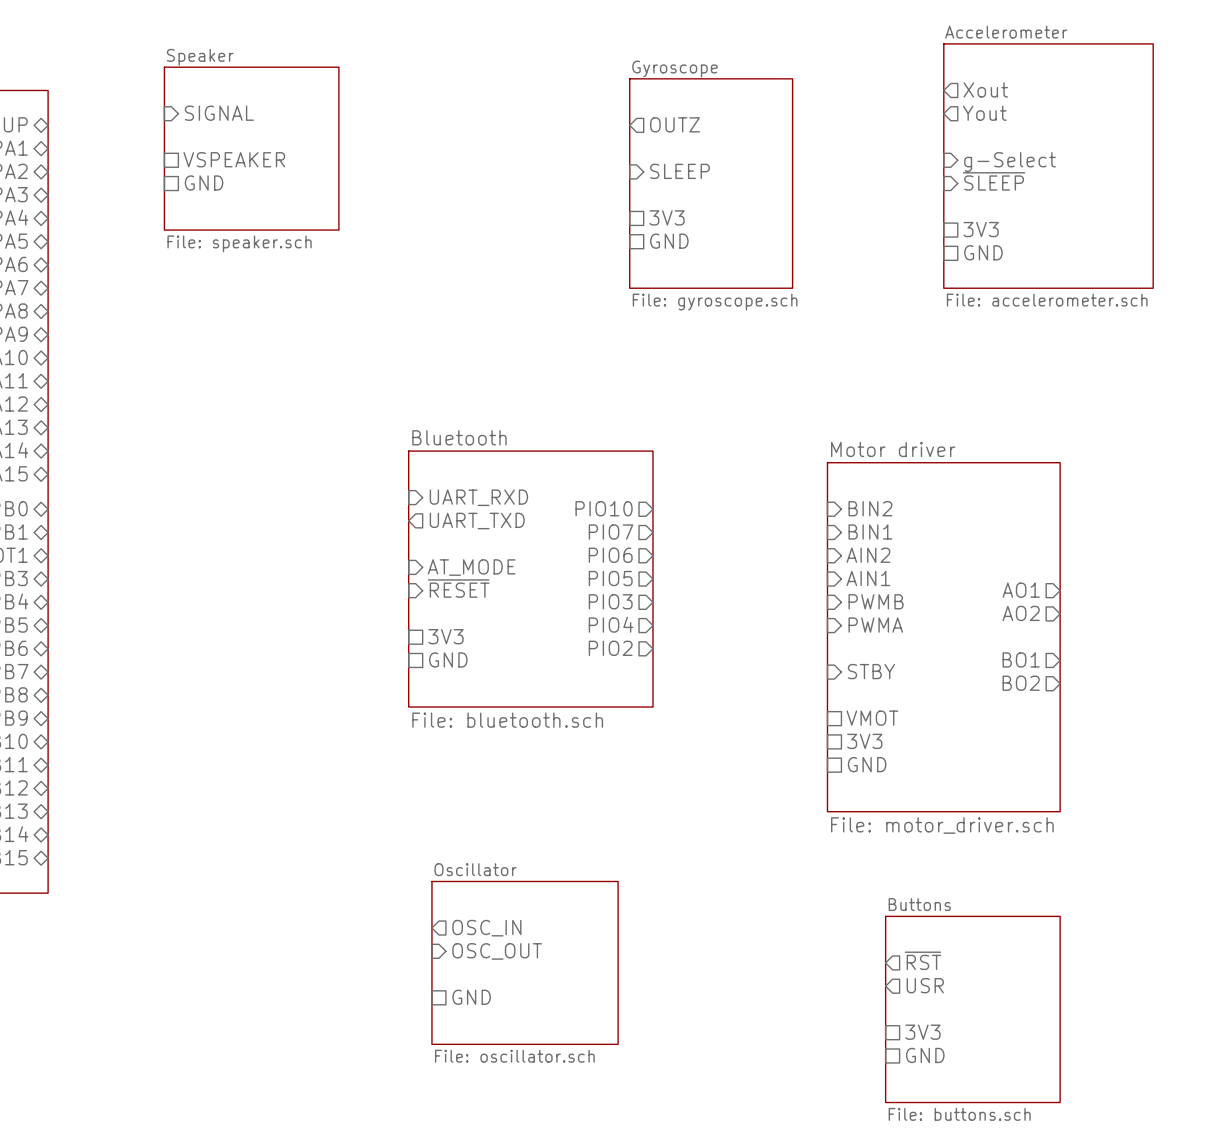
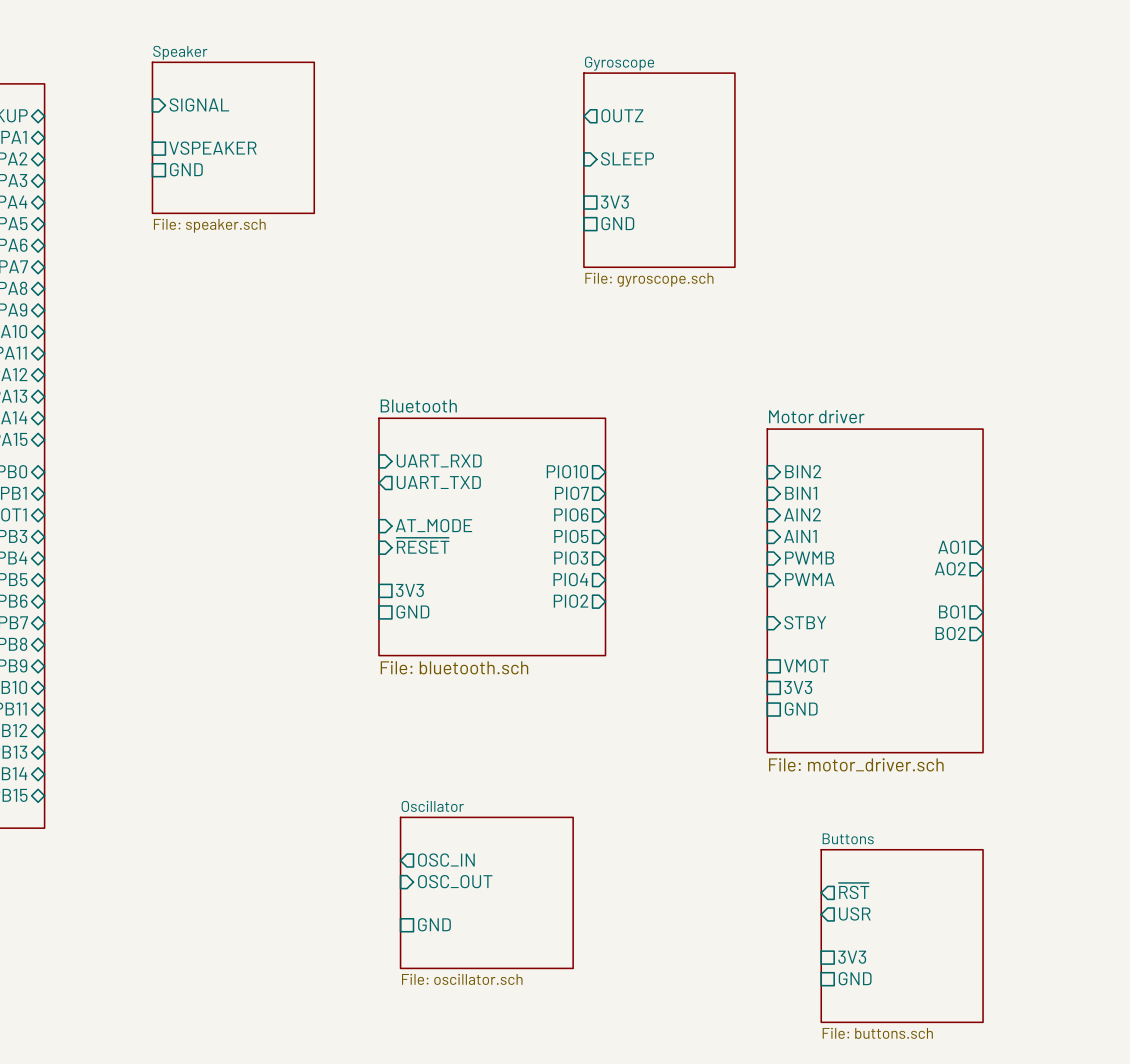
sheet pin: Xout (985, 89) -> none
sheet pin: Yout (984, 113) -> none
sheet pin: g-Select (1010, 162) -> none
sheet Accelerometer: File: accelerometer.sch (1048, 166) -> none
sheet pin: ~{SLEEP} (994, 181) -> none
sheet pin: 3V3 (981, 229) -> none
sheet pin: GND (983, 252) -> none

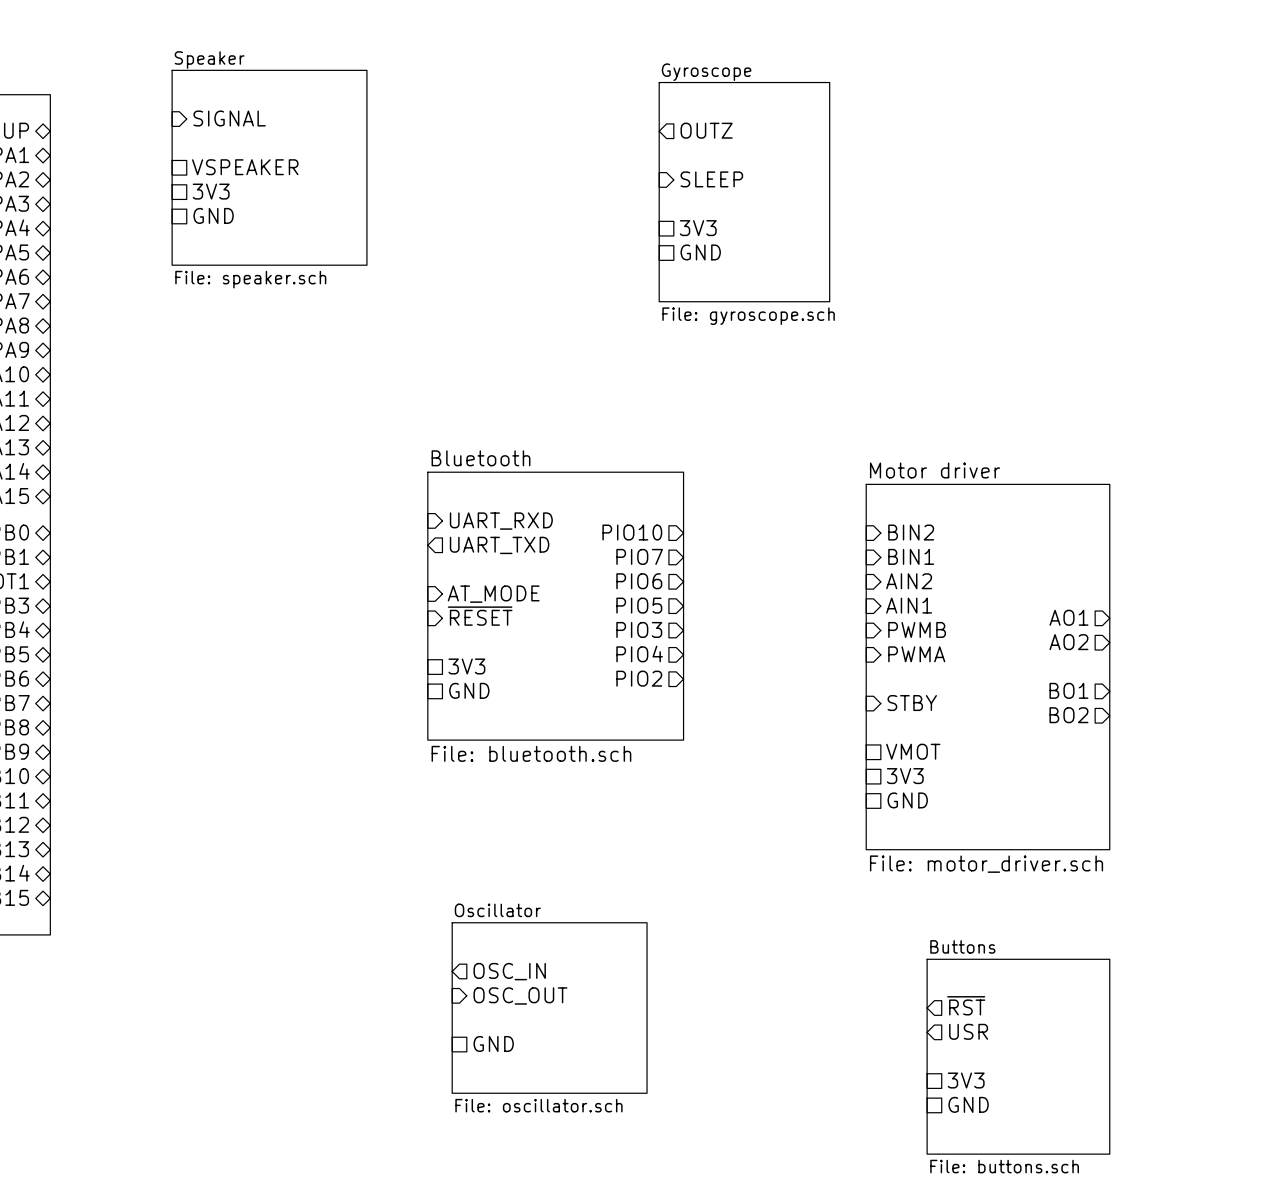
sheet Speaker: File: speaker.sch (233, 137) -> none
sheet Speaker: none -> File: speaker.sch (269, 167)
sheet pin: GND (186, 169) -> 3V3 (211, 191)
sheet pin: none -> GND (213, 215)

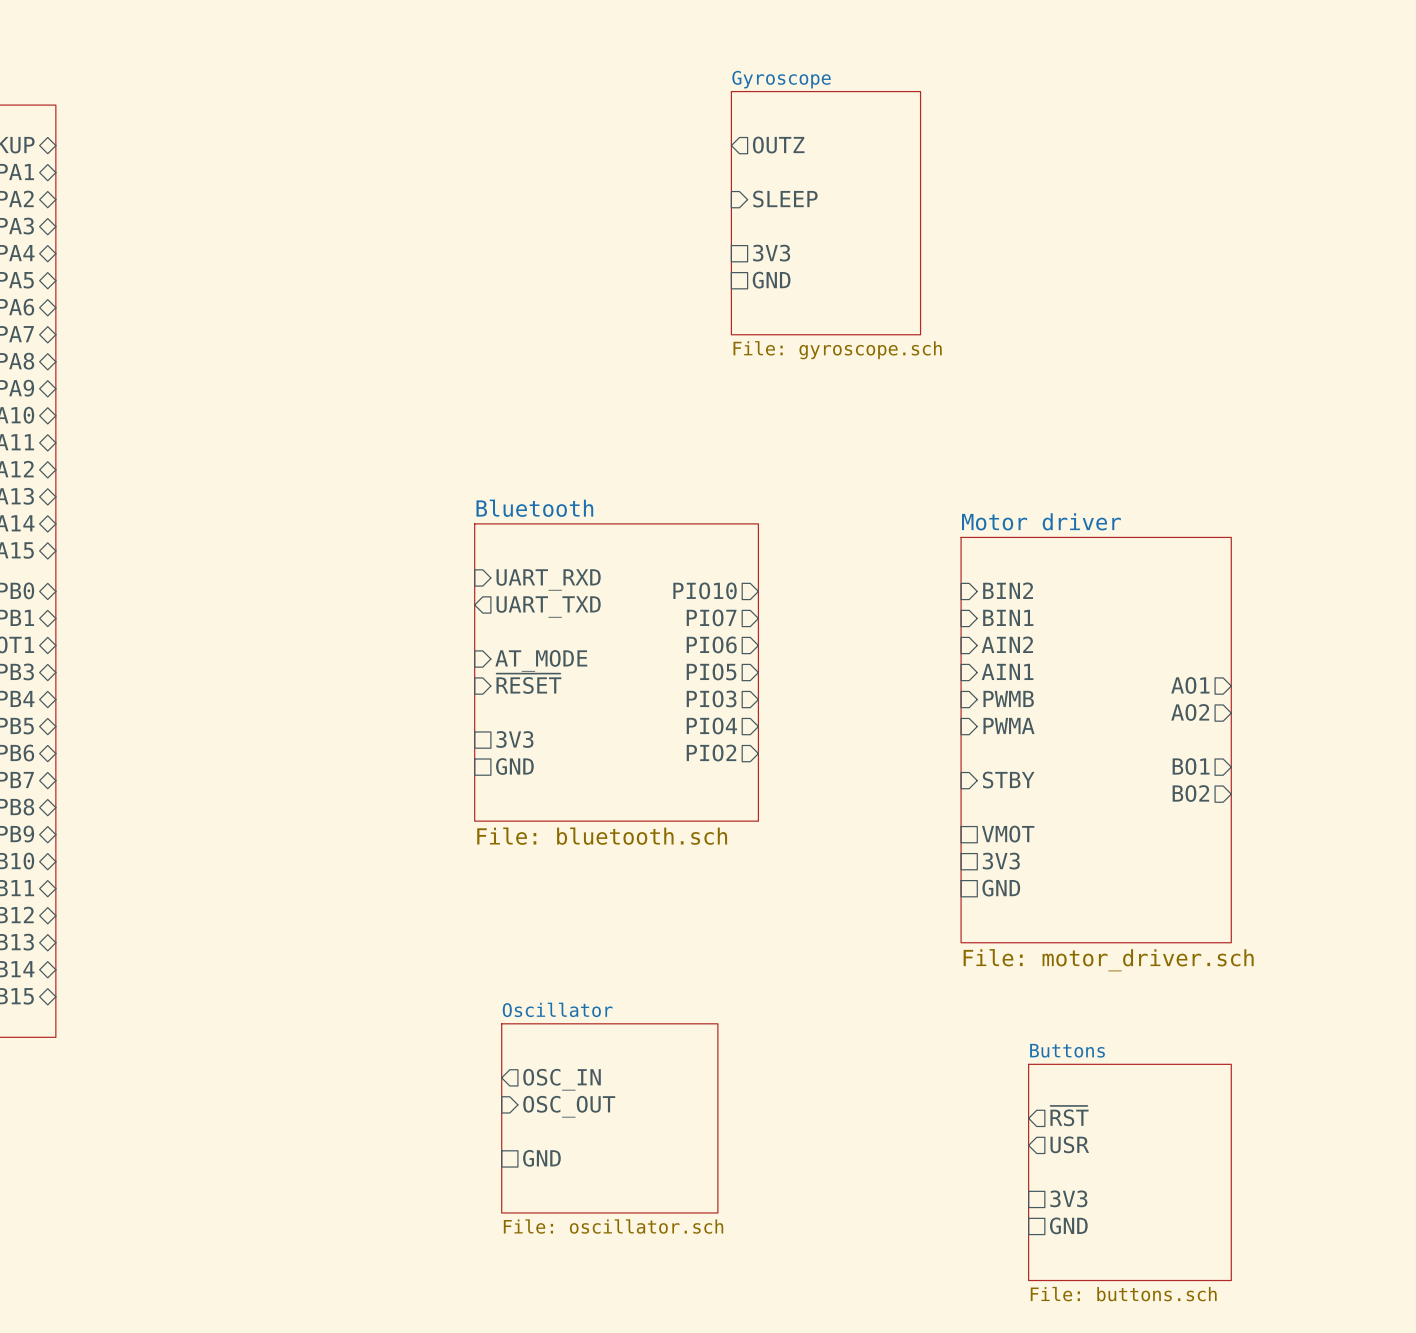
sheet pin: SIGNAL (229, 118) -> none
sheet pin: VSPEAKER (245, 167) -> none
sheet Speaker: File: speaker.sch (269, 167) -> none
sheet pin: 3V3 (211, 191) -> none
sheet pin: GND (213, 215) -> none

